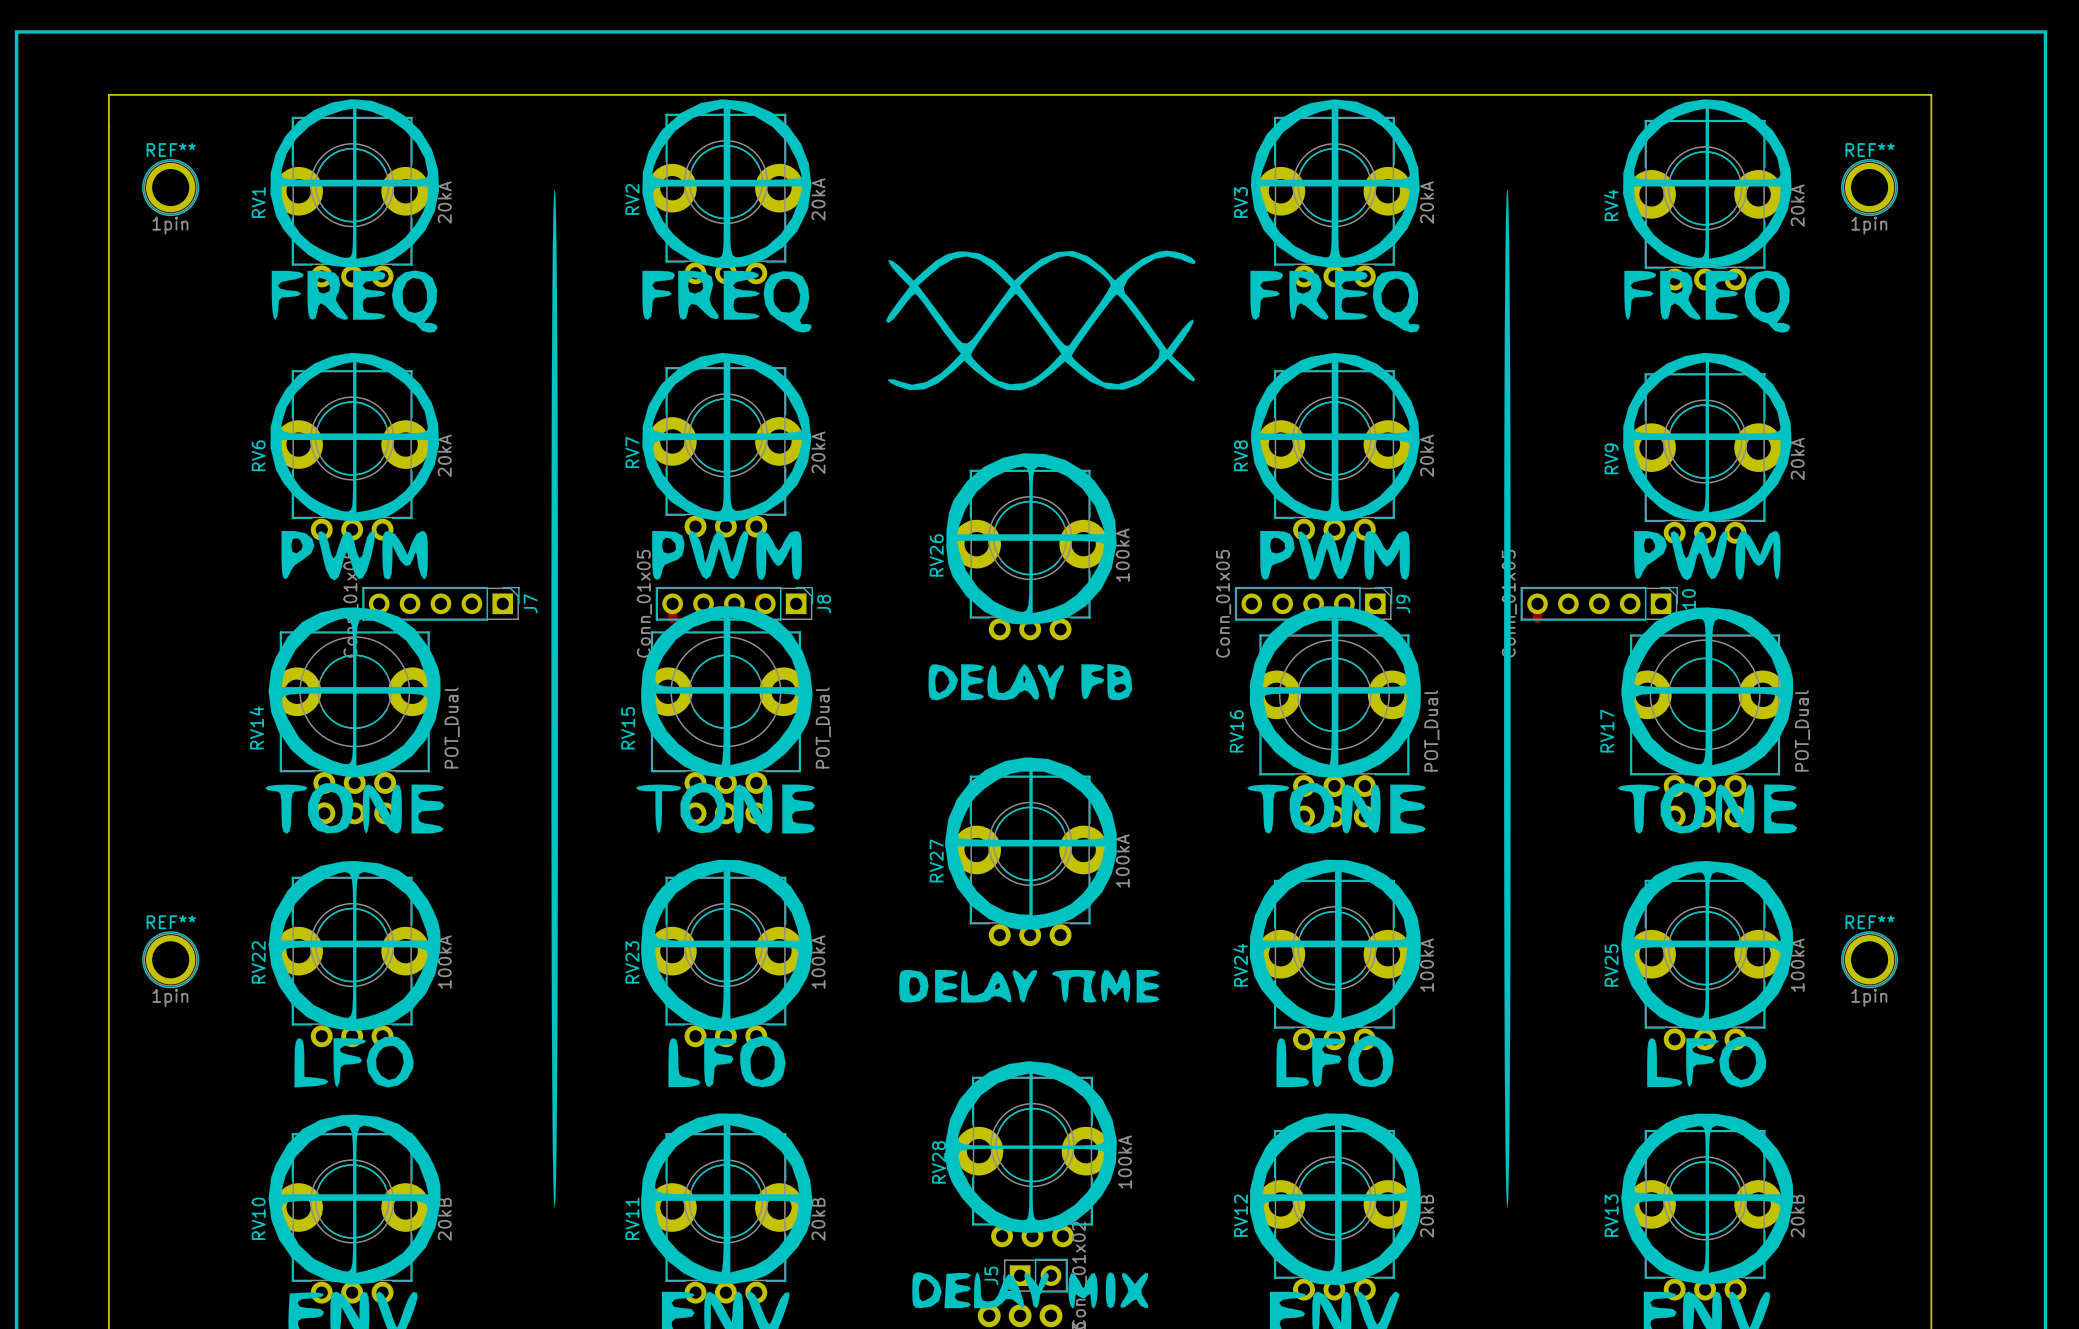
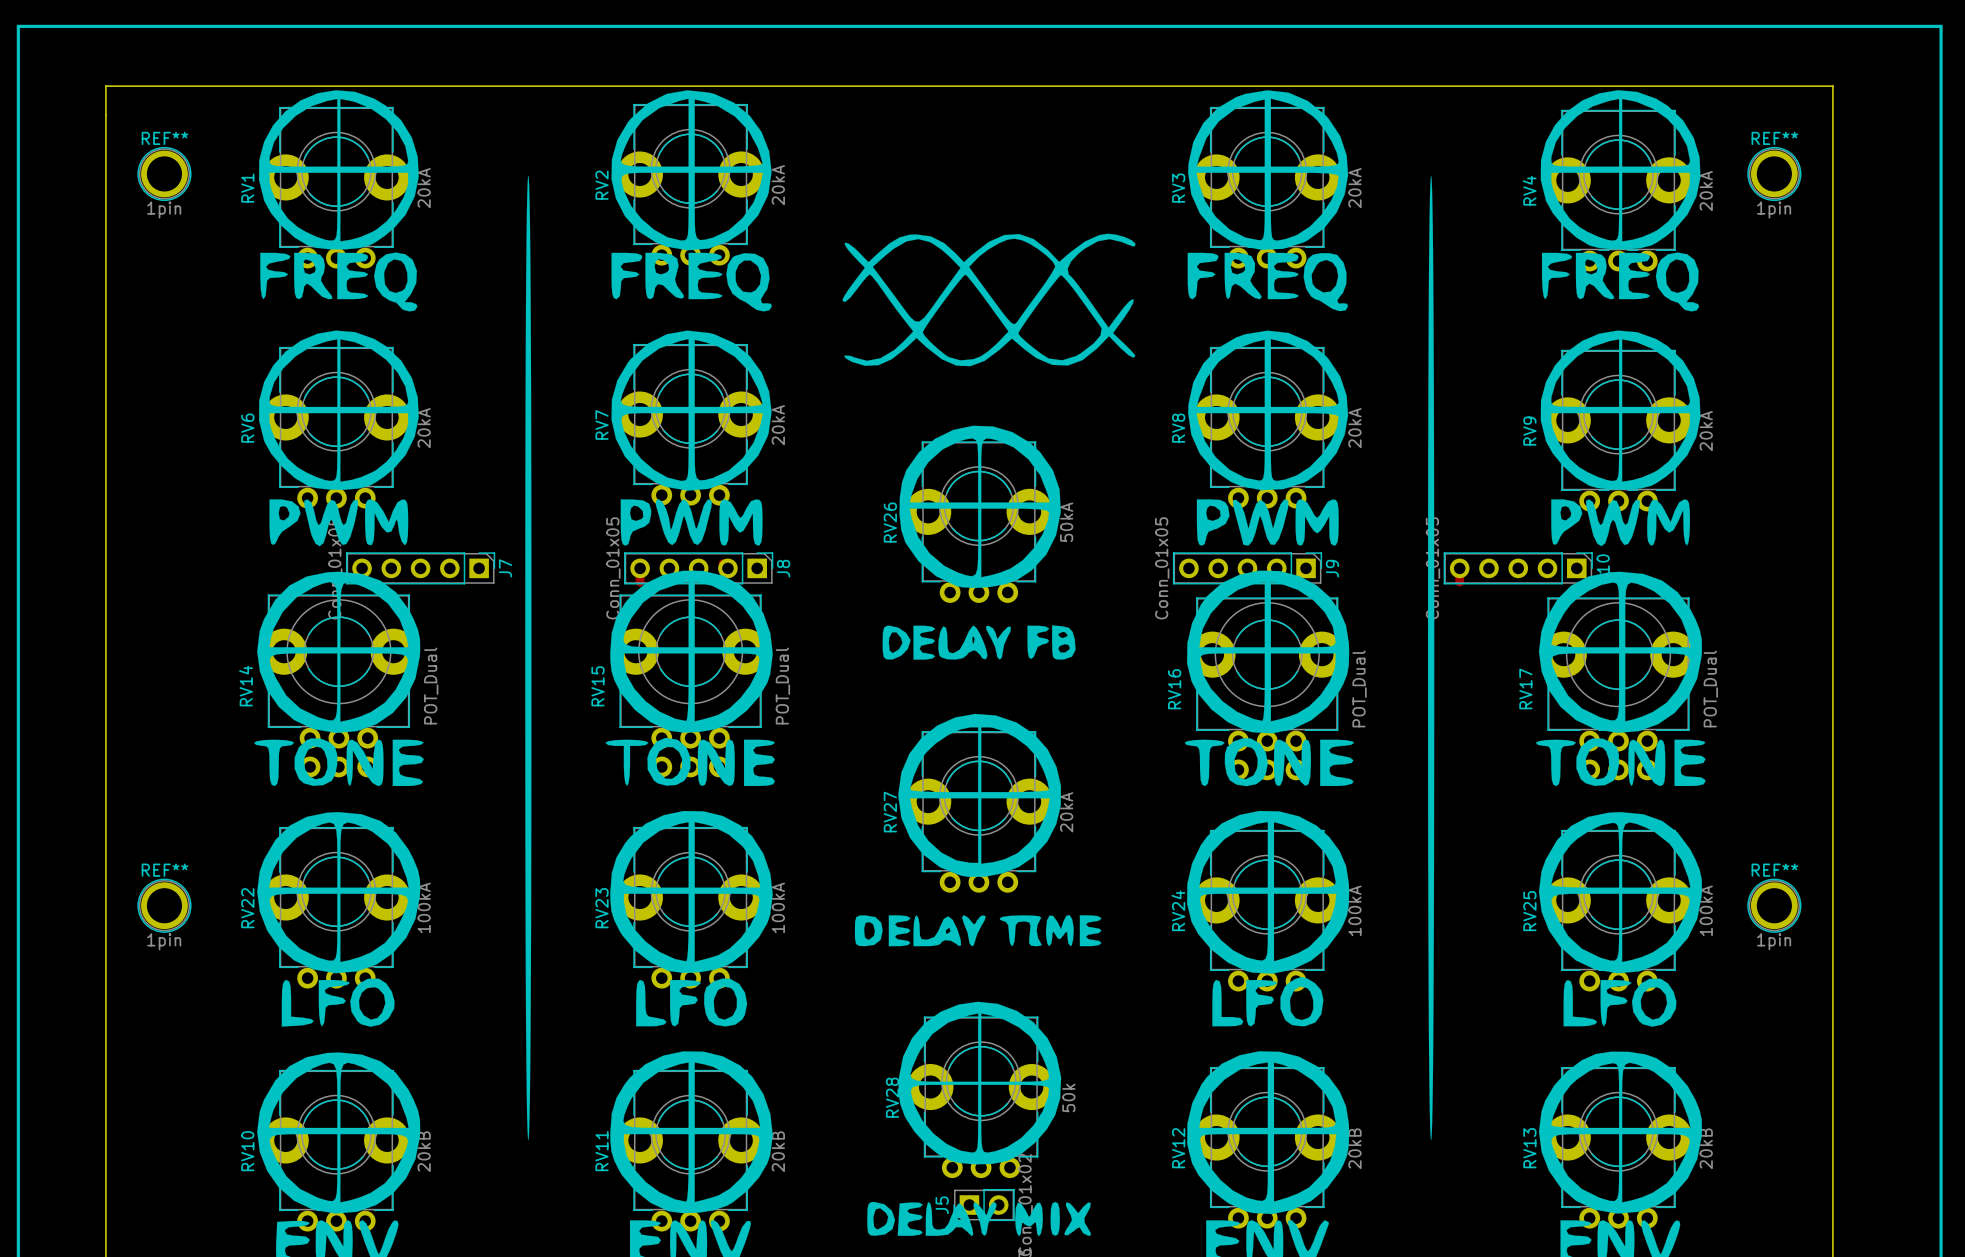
RV26 value: 100kA (1122, 555) -> 50kA (1066, 522)
RV27 value: 100kA (1122, 860) -> 20kA (1066, 812)
RV28 value: 100kA (1125, 1162) -> 50k (1068, 1097)
part: (1020, 1315) -> none

